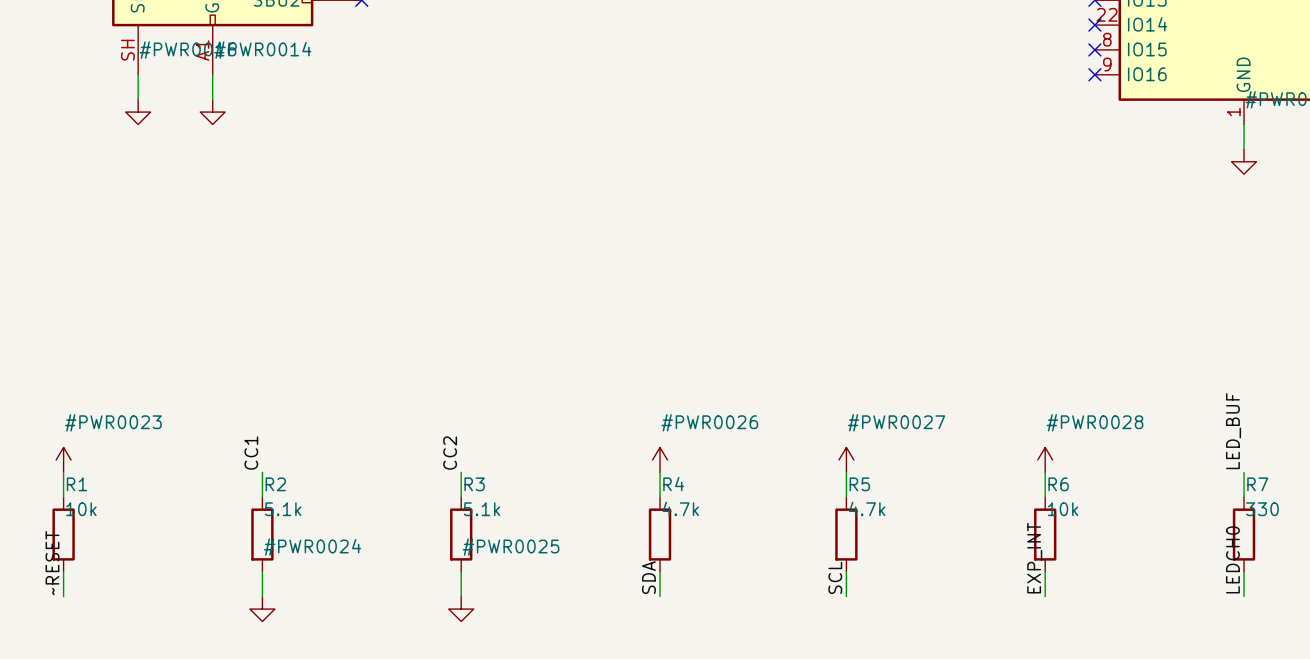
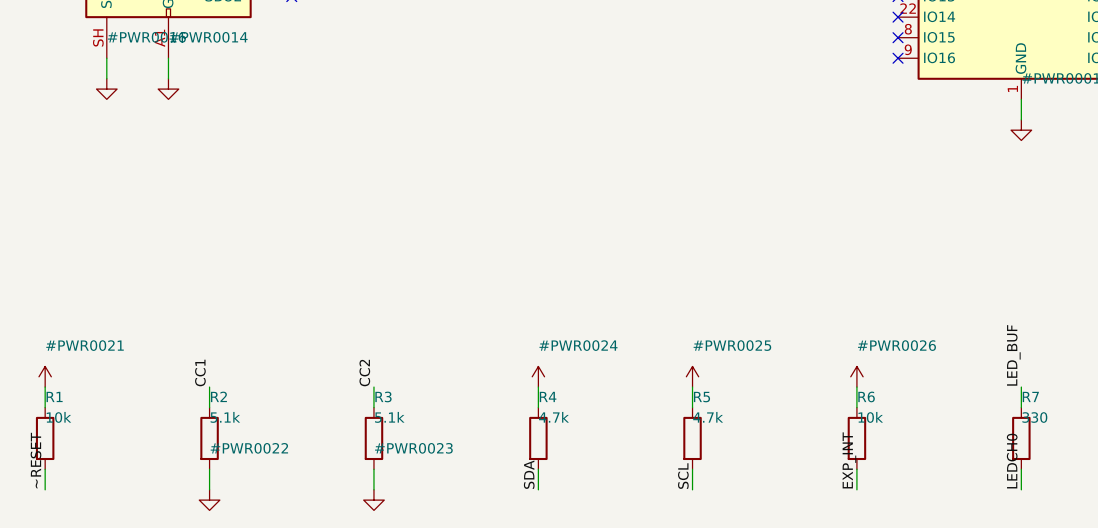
#PWR0023 name: #PWR0023 (113, 422) -> #PWR0021 (85, 345)
#PWR0026 name: #PWR0026 (709, 422) -> #PWR0024 (578, 345)
#PWR0027 name: #PWR0027 (896, 422) -> #PWR0025 (732, 345)
#PWR0028 name: #PWR0028 (1095, 422) -> #PWR0026 (896, 345)
#PWR0024 name: #PWR0024 (312, 547) -> #PWR0022 (249, 448)
#PWR0025 name: #PWR0025 (511, 547) -> #PWR0023 (413, 448)

